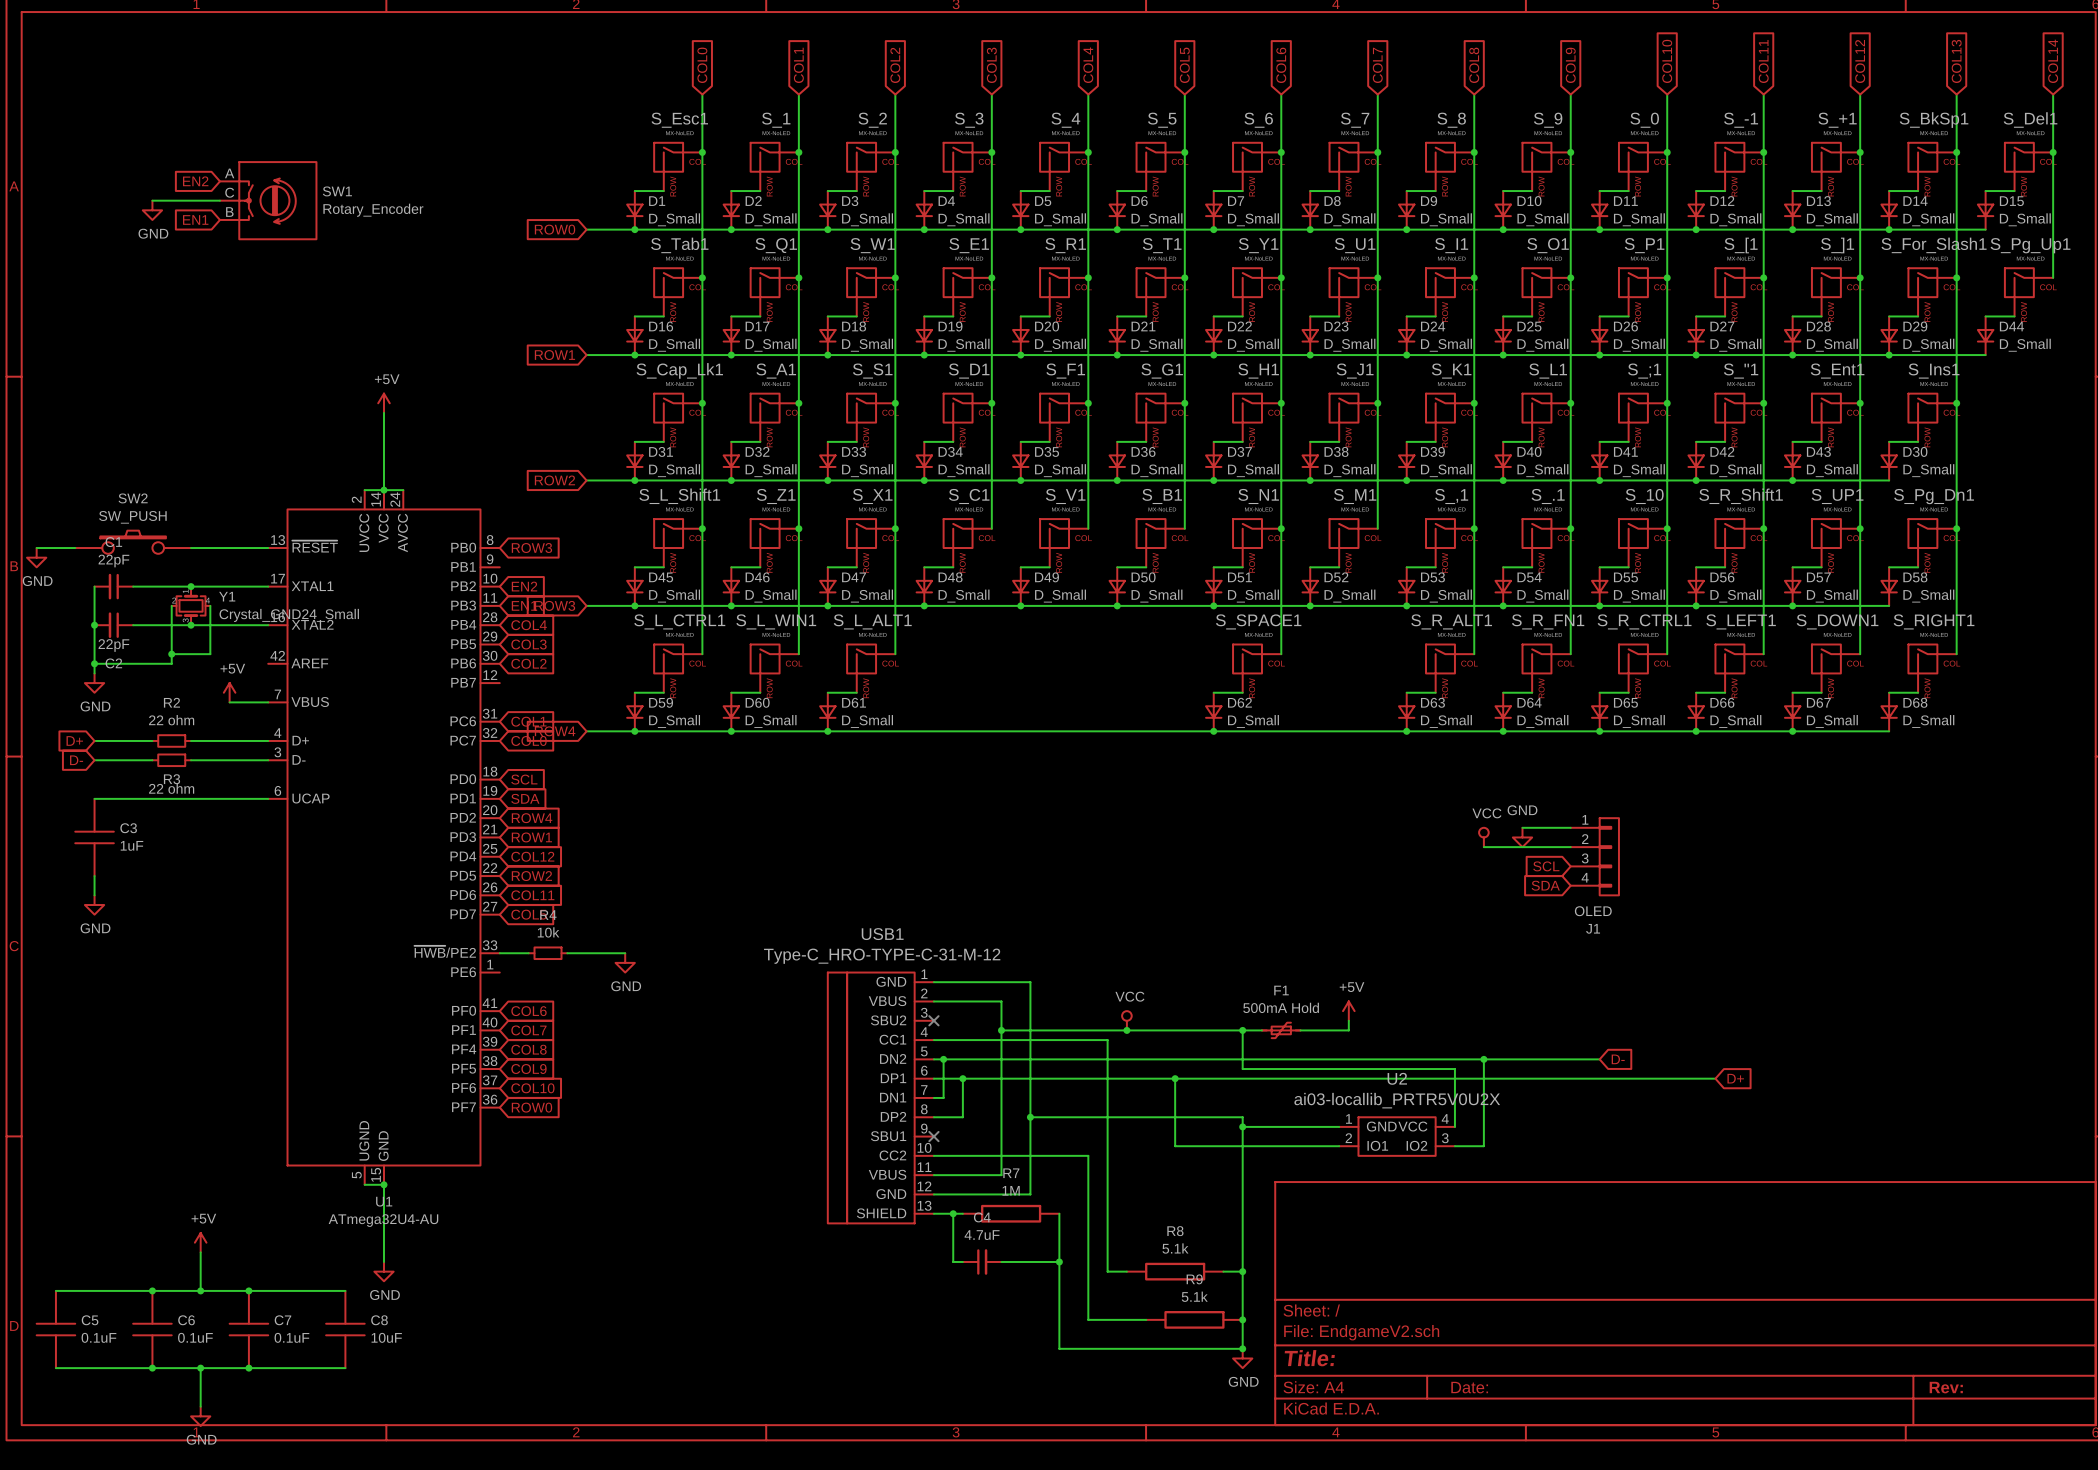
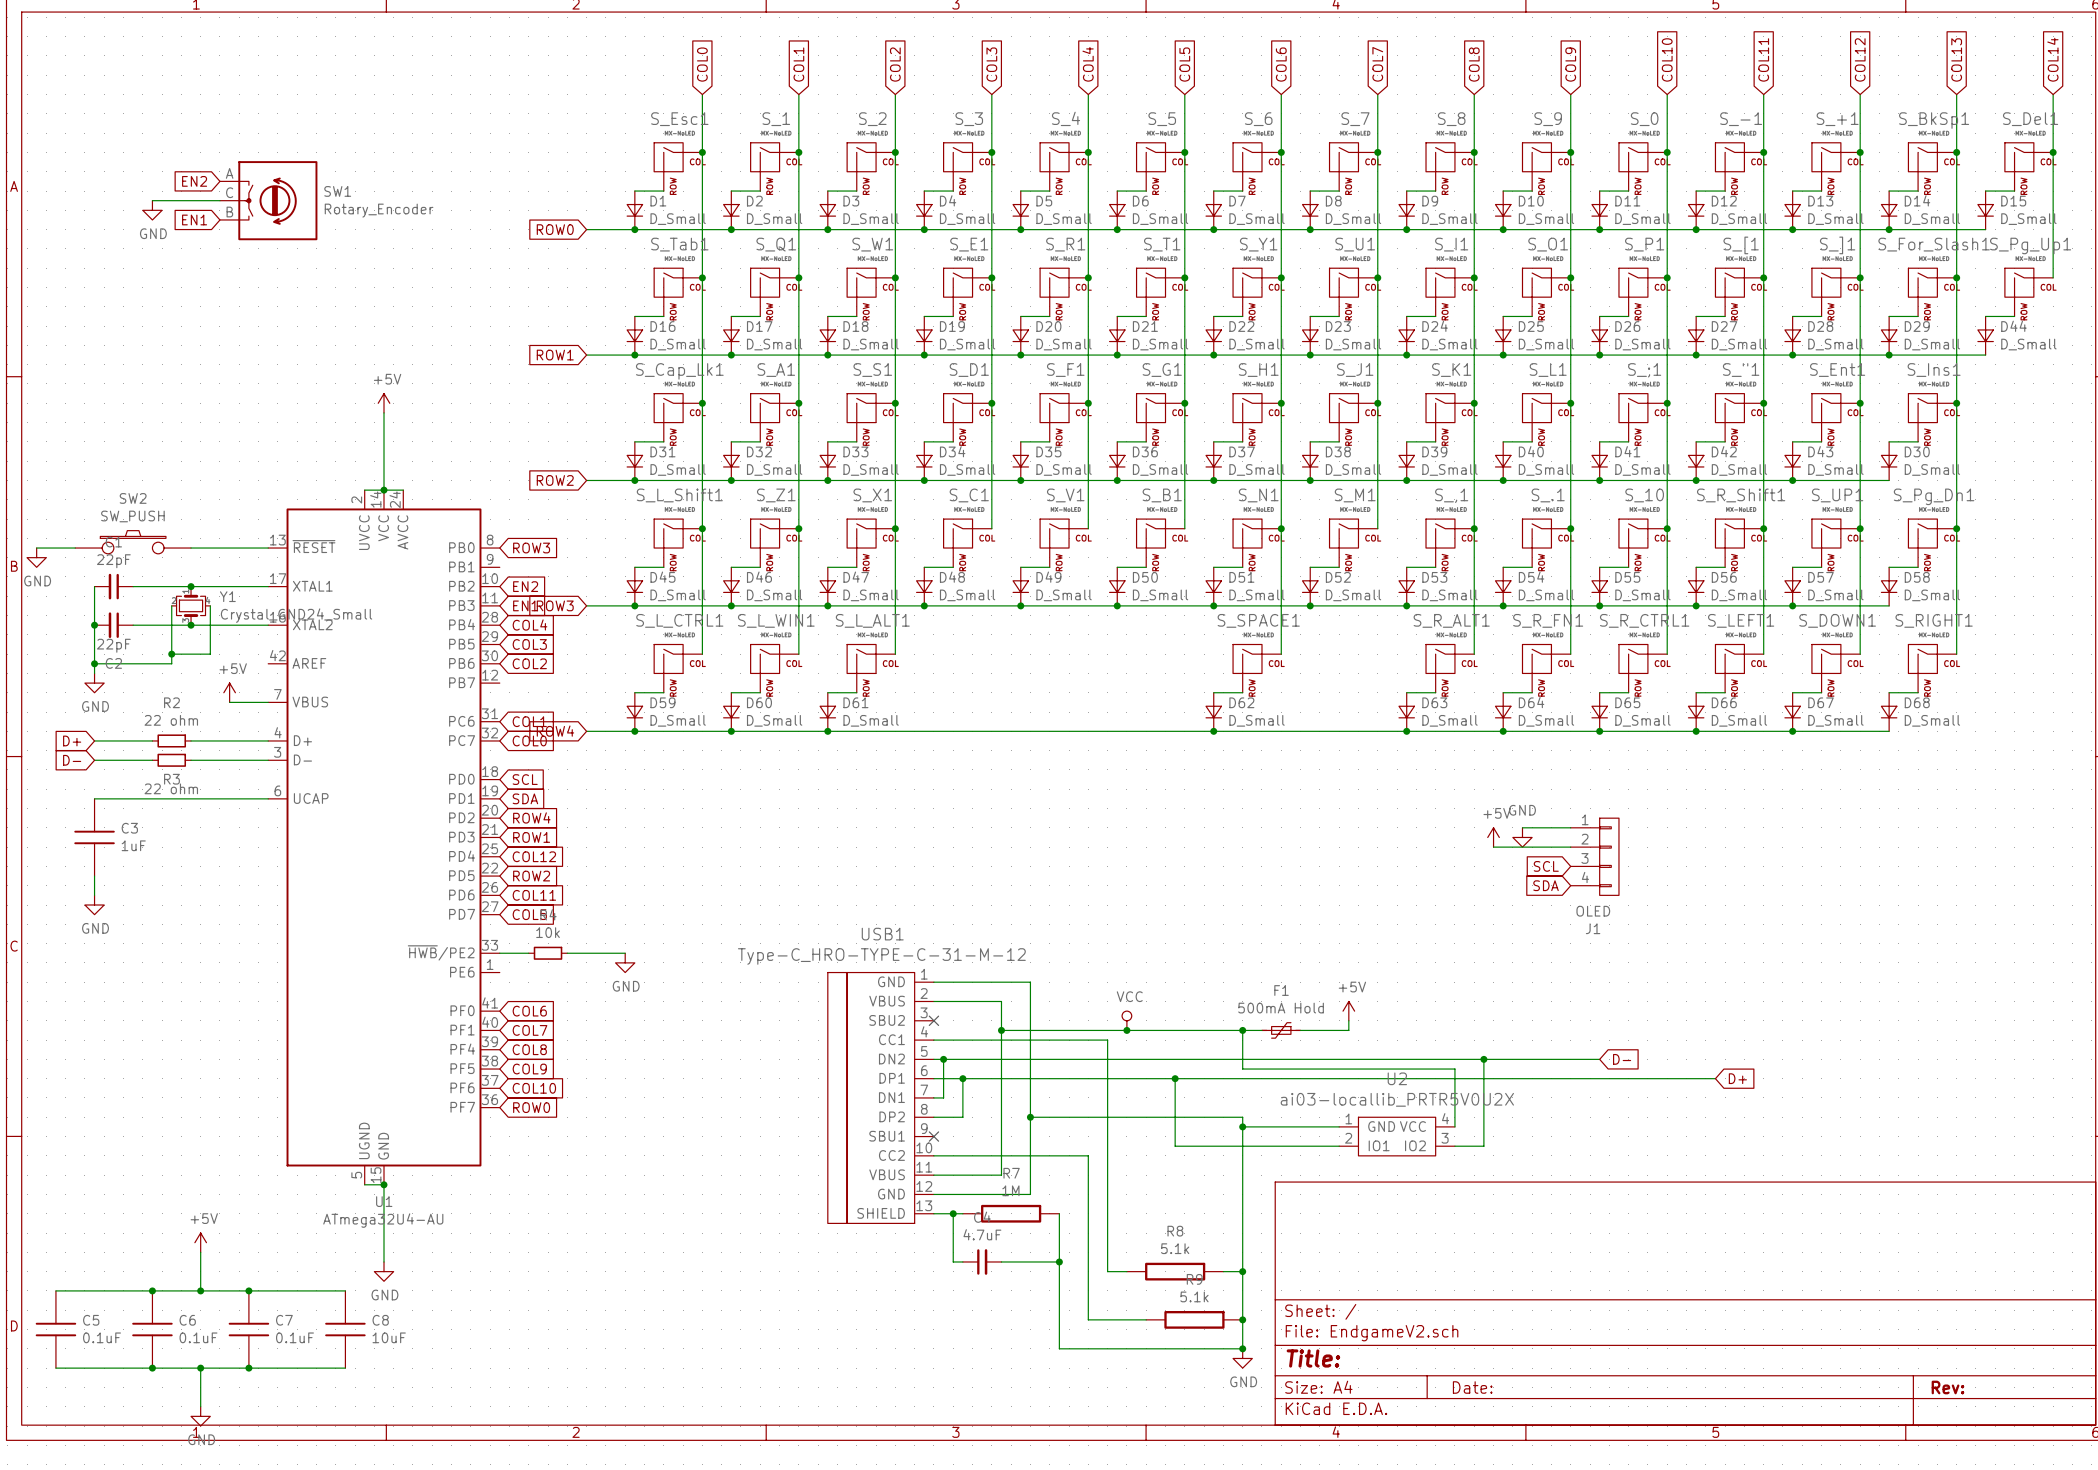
power symbol: VCC (1483, 837) -> none
power symbol: none -> +5V (1493, 837)
wire: (1483, 847) (1493, 847) -> none

